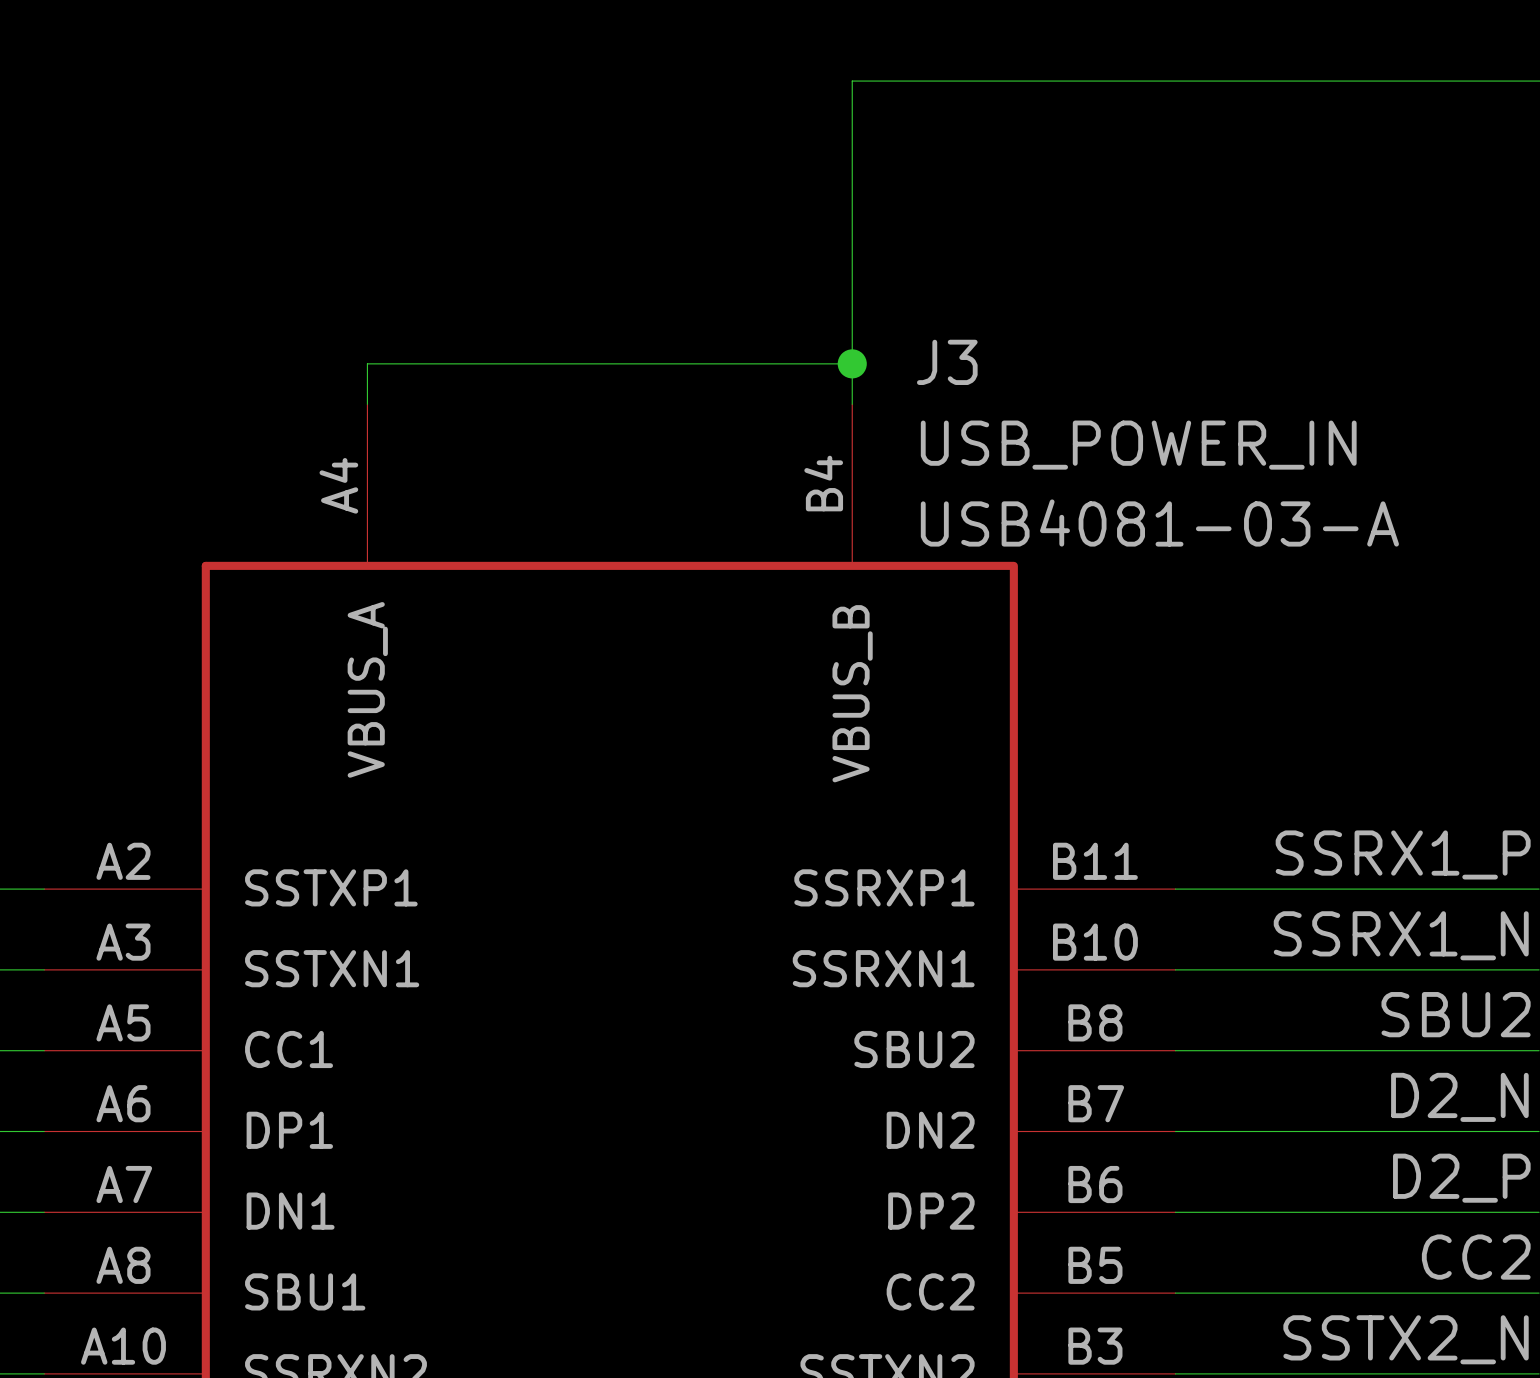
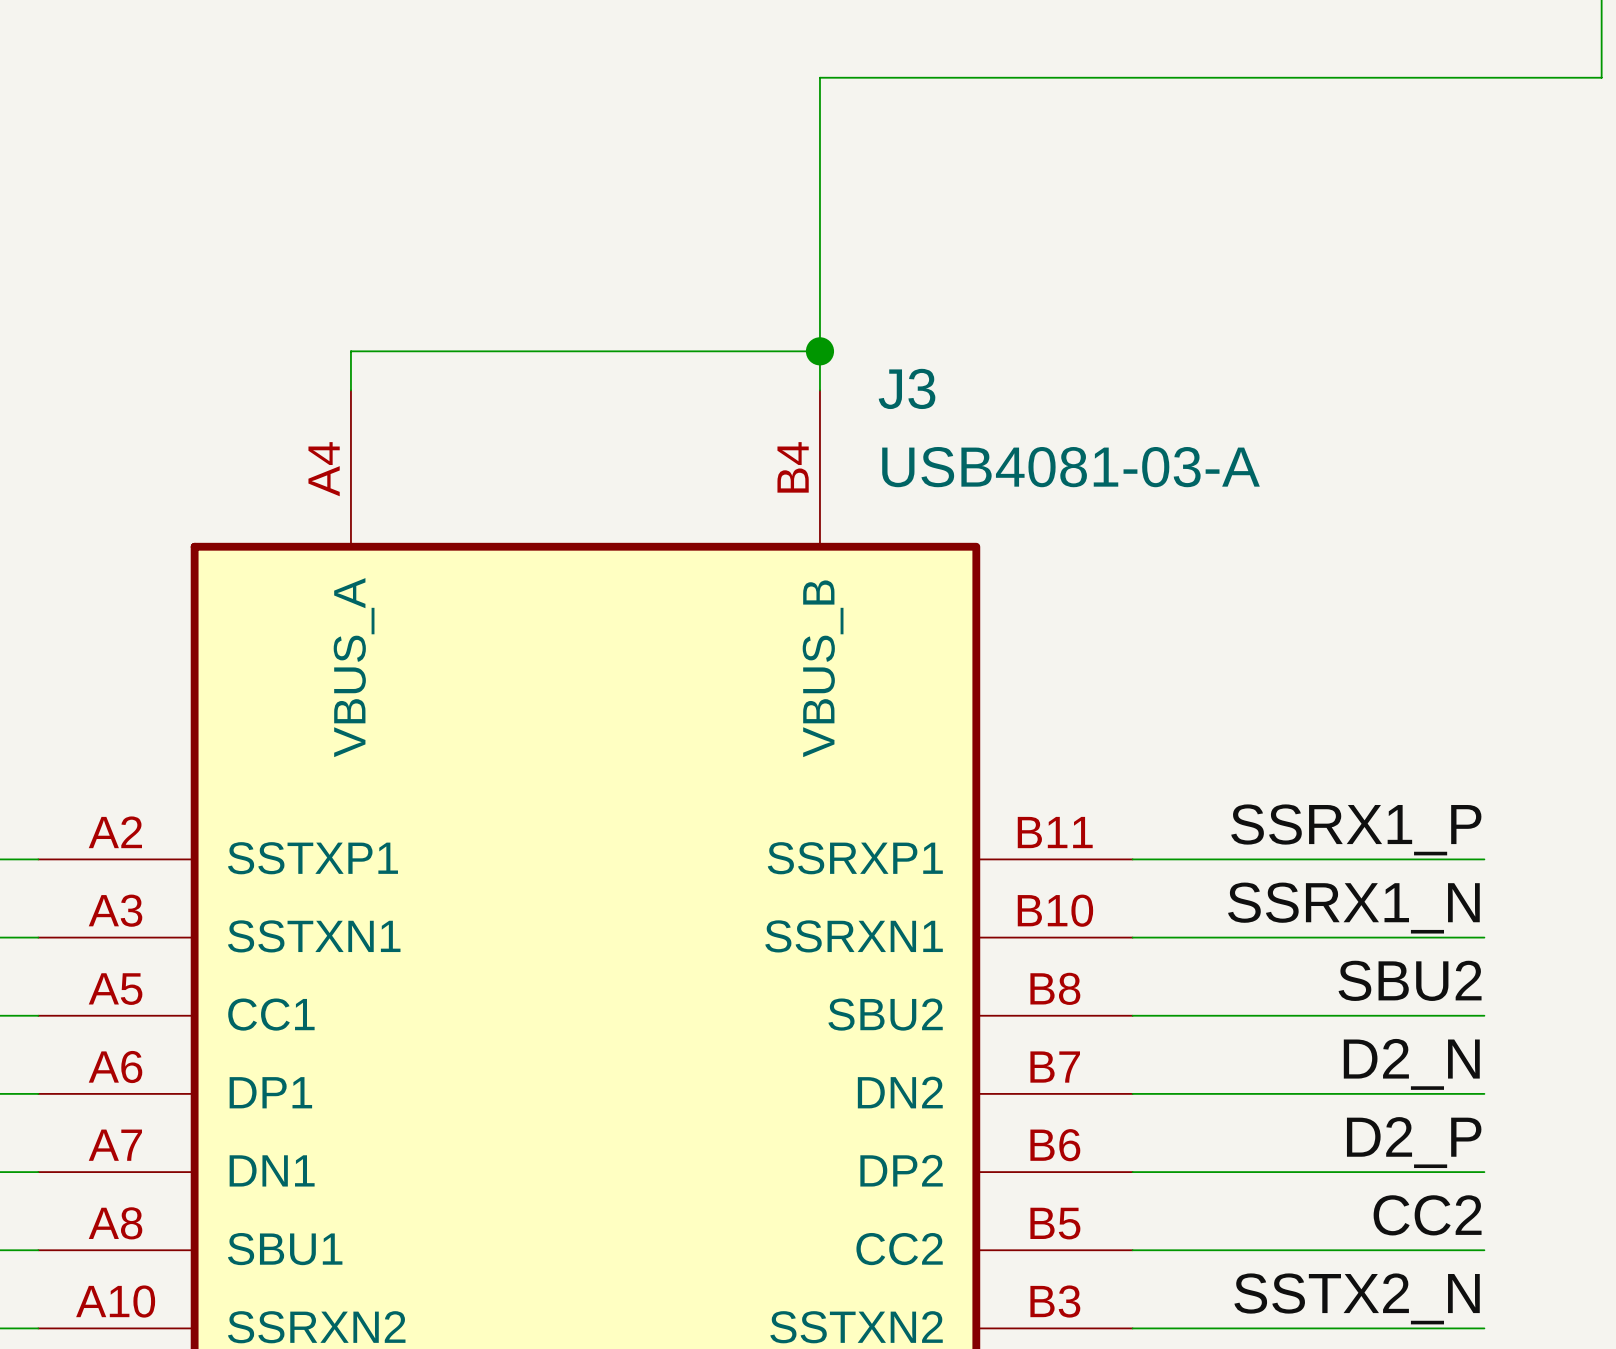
J3 name position: J3 (947, 362) -> J3 (907, 388)
J3 value: USB_POWER_IN (1138, 445) -> USB4081-03-A (1071, 467)
J3 text: USB4081-03-A (1159, 523) -> none

